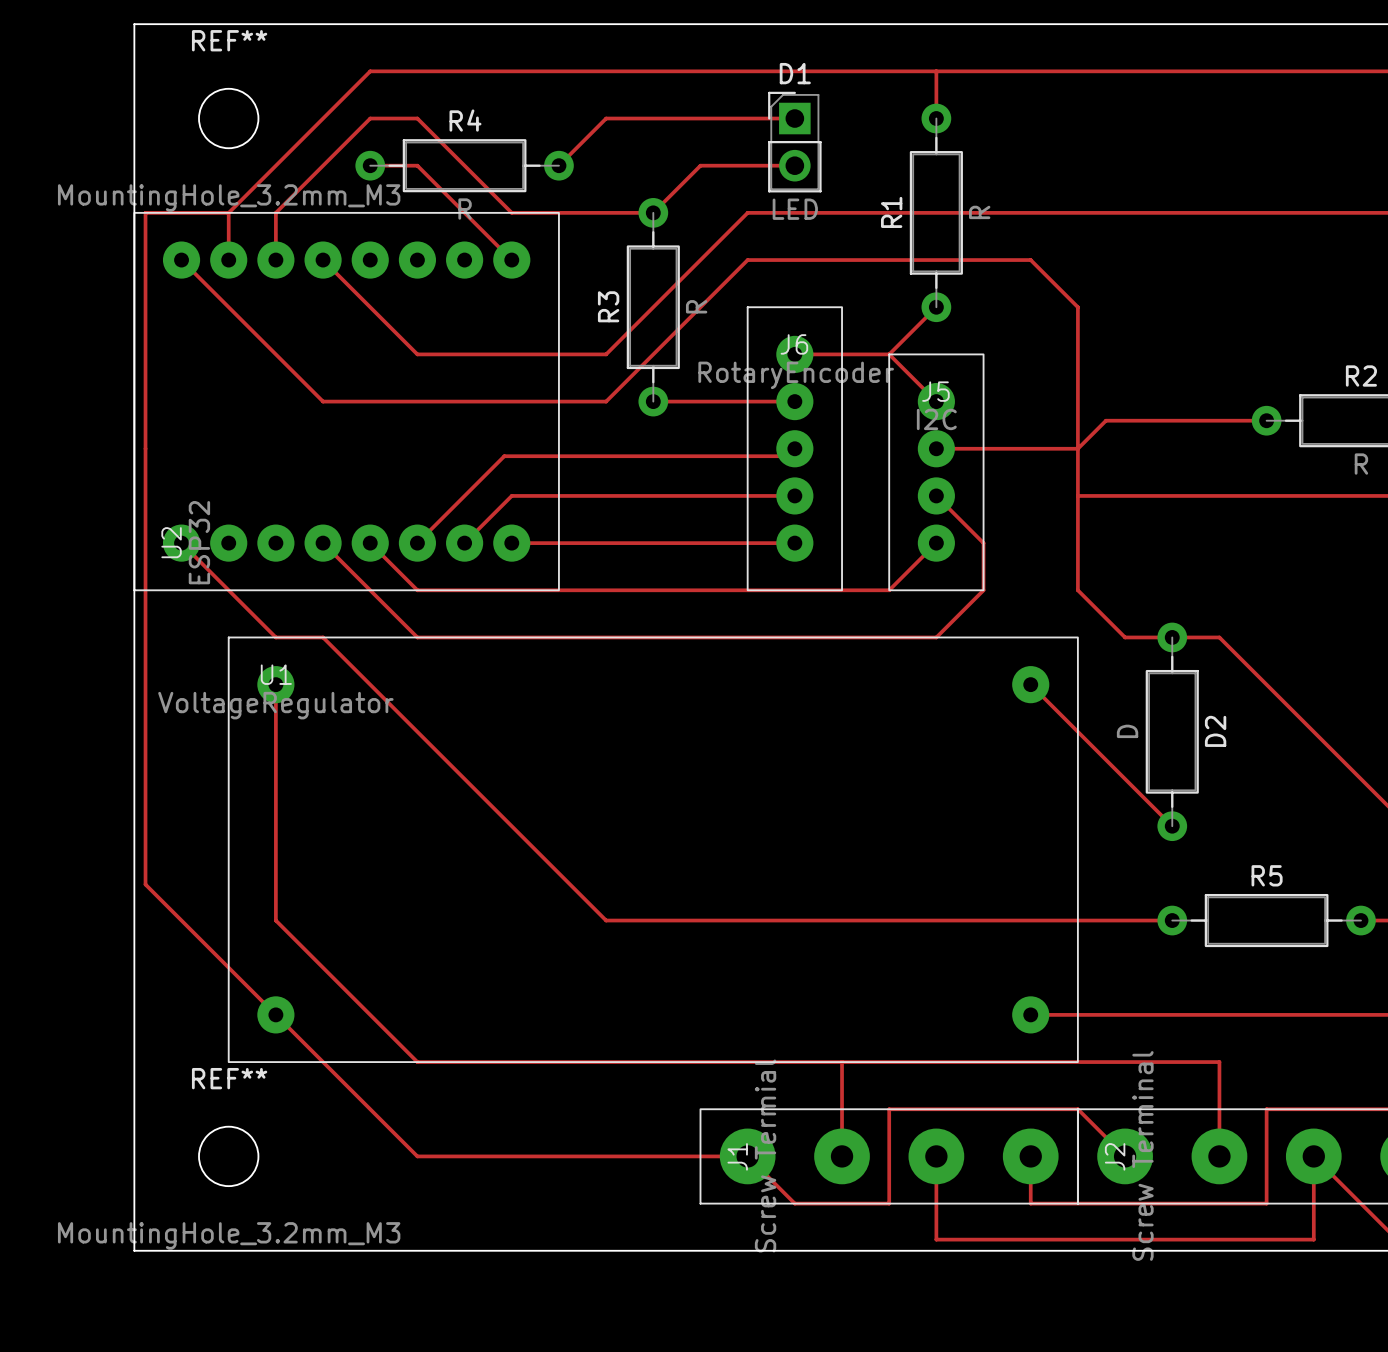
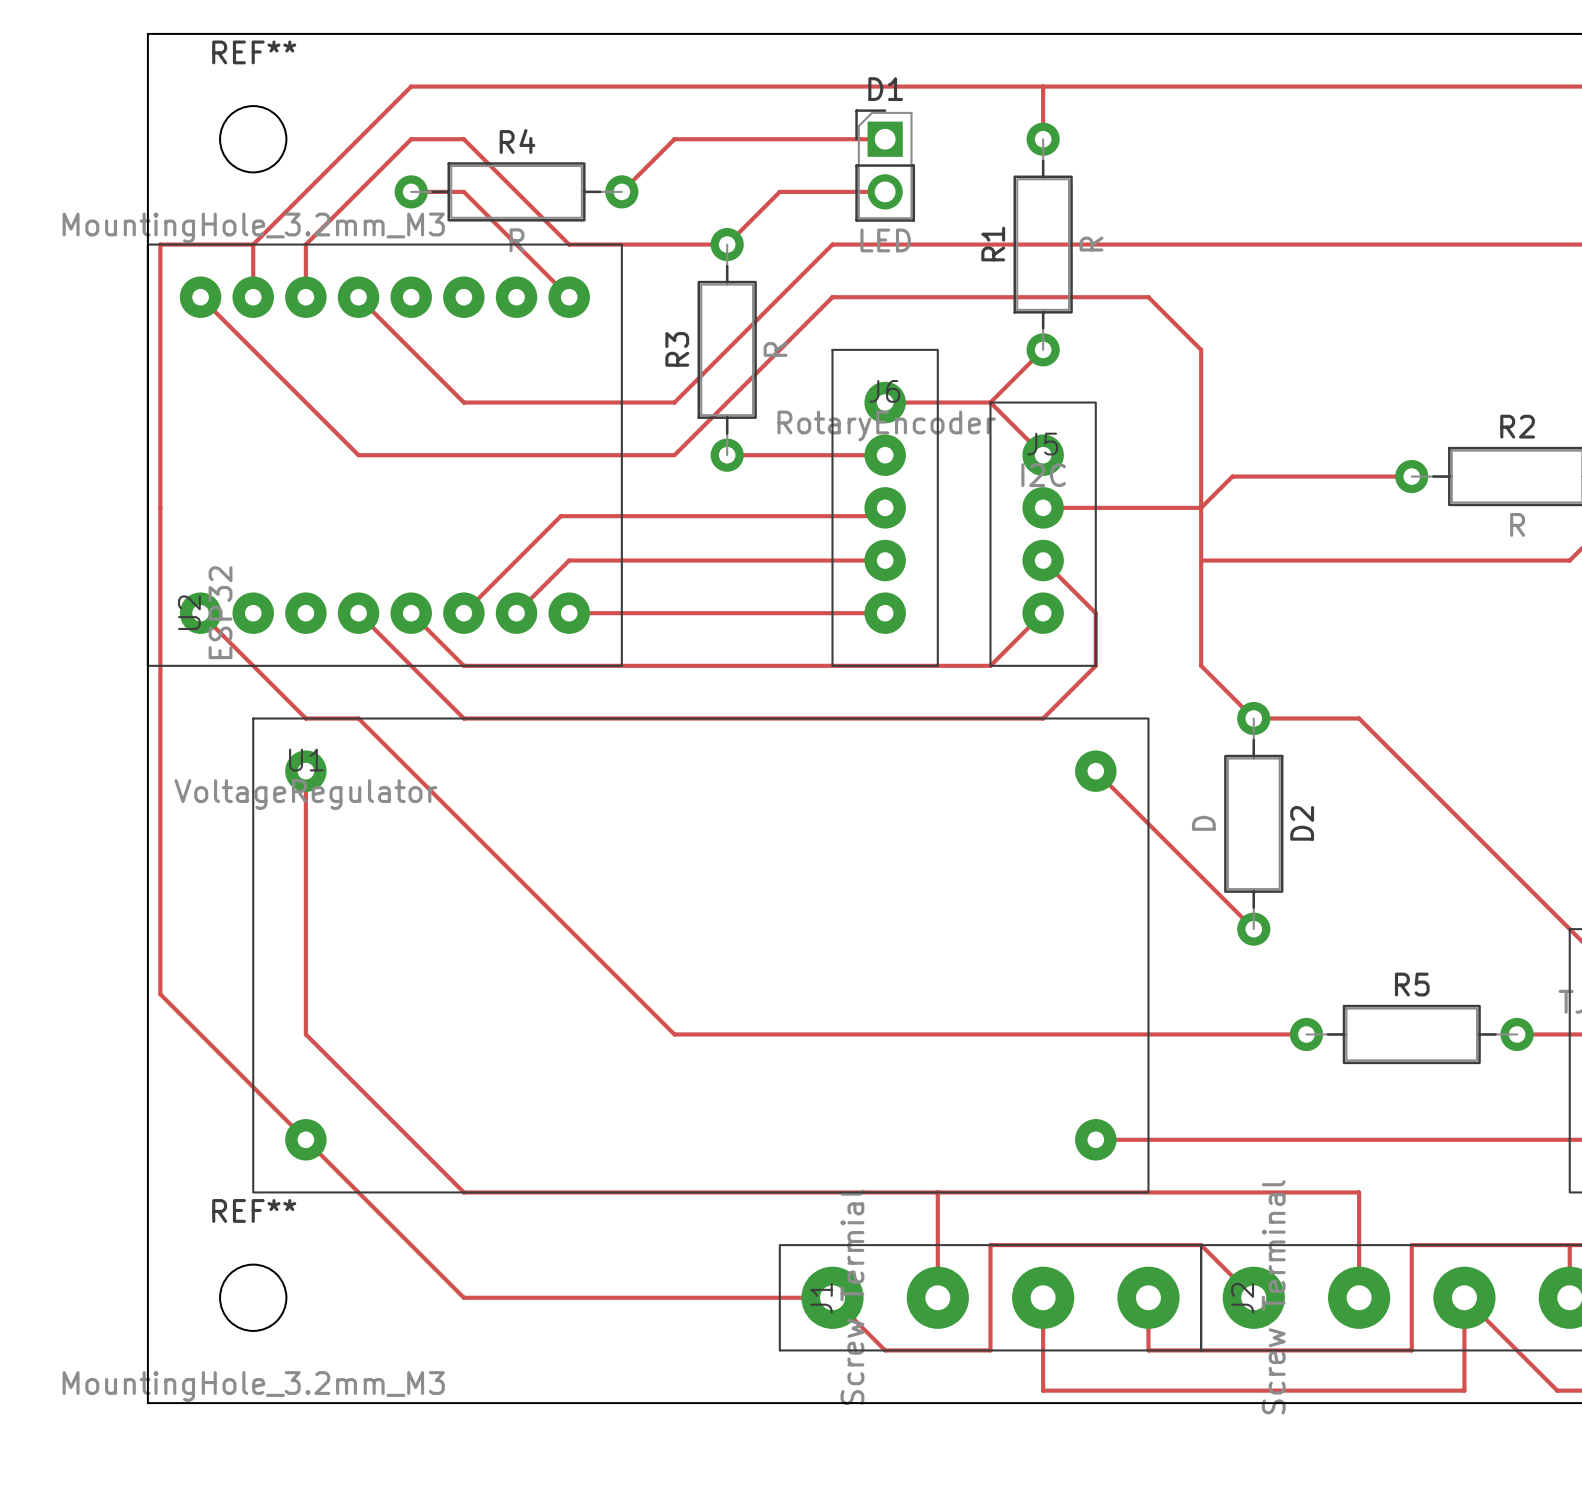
U1 footprint: [227, 636, 1079, 1064] -> [252, 717, 1150, 1194]
track: (1030, 684) (1172, 826) -> (1095, 771) (1253, 929)
D2 position: (1172, 731) -> (1253, 823)
track: none -> (1095, 1139) (1148, 1139)

